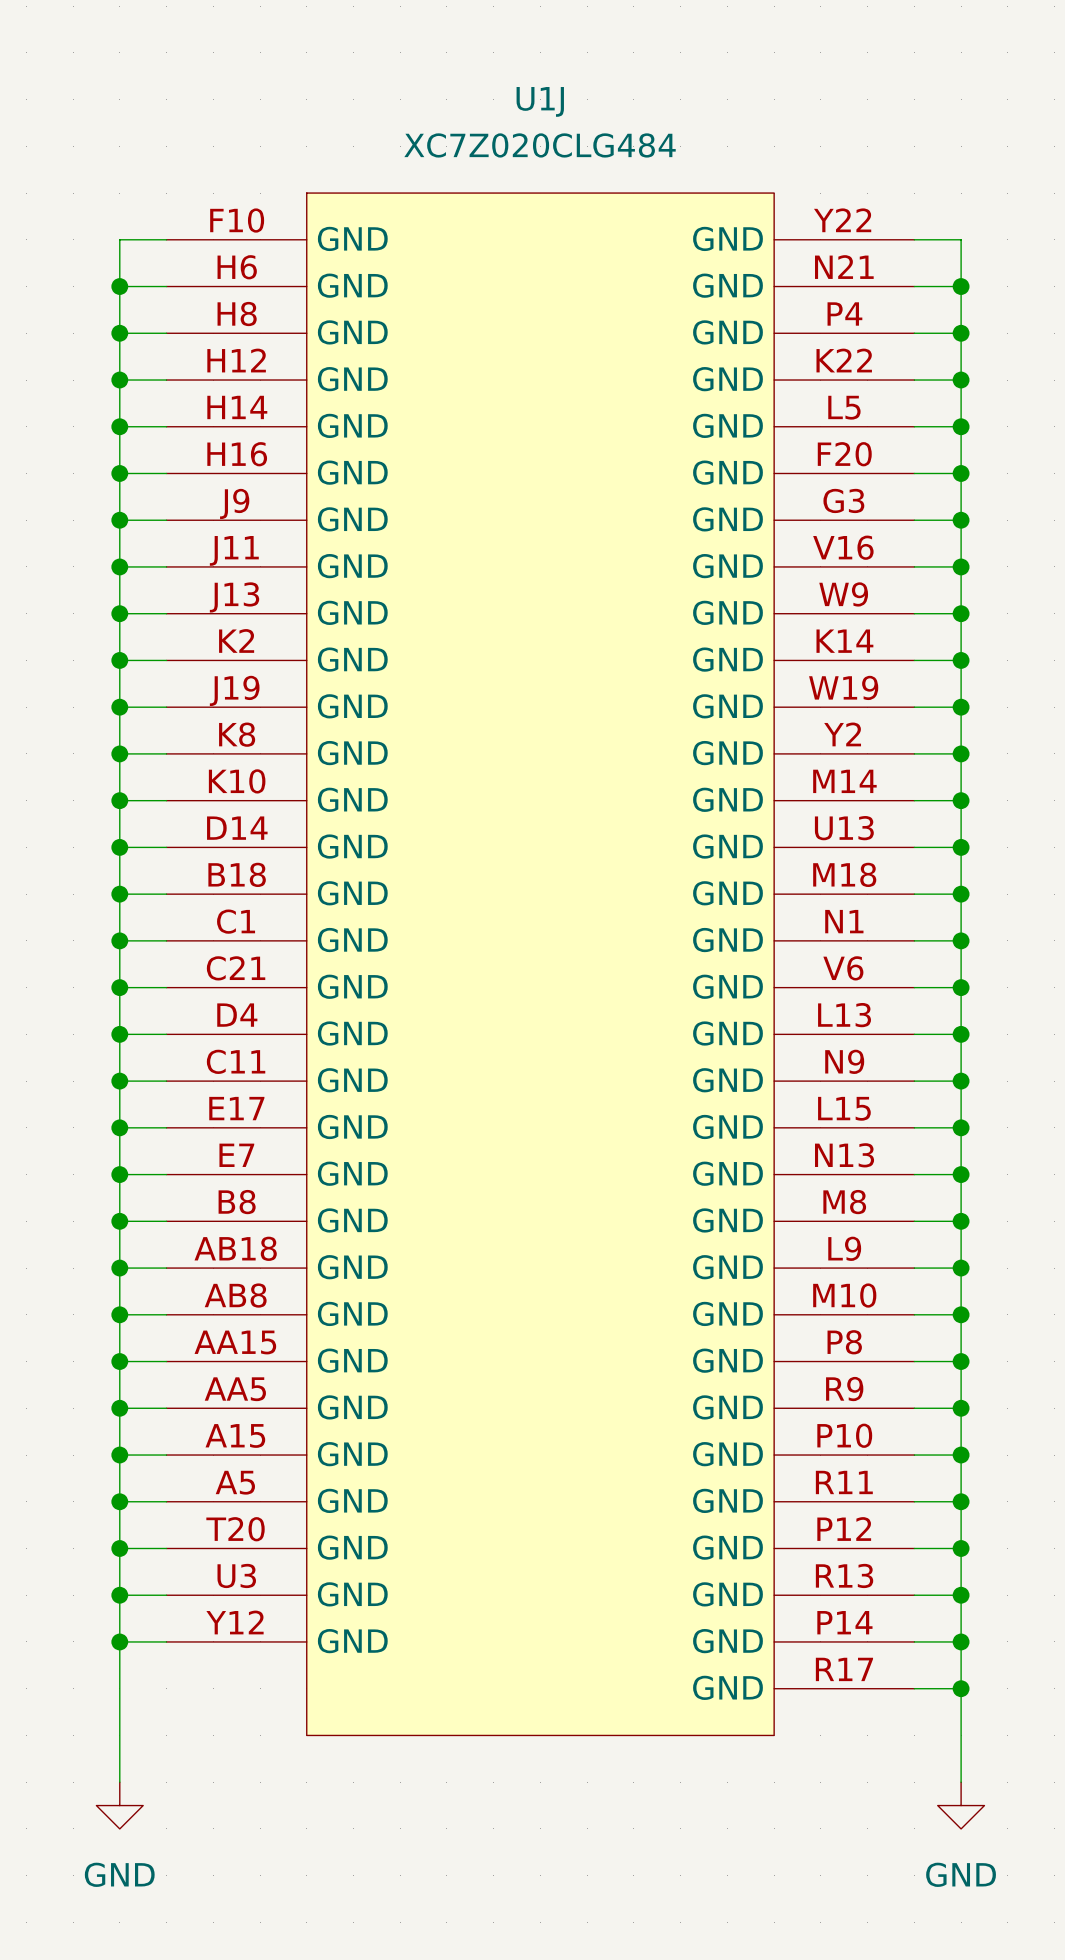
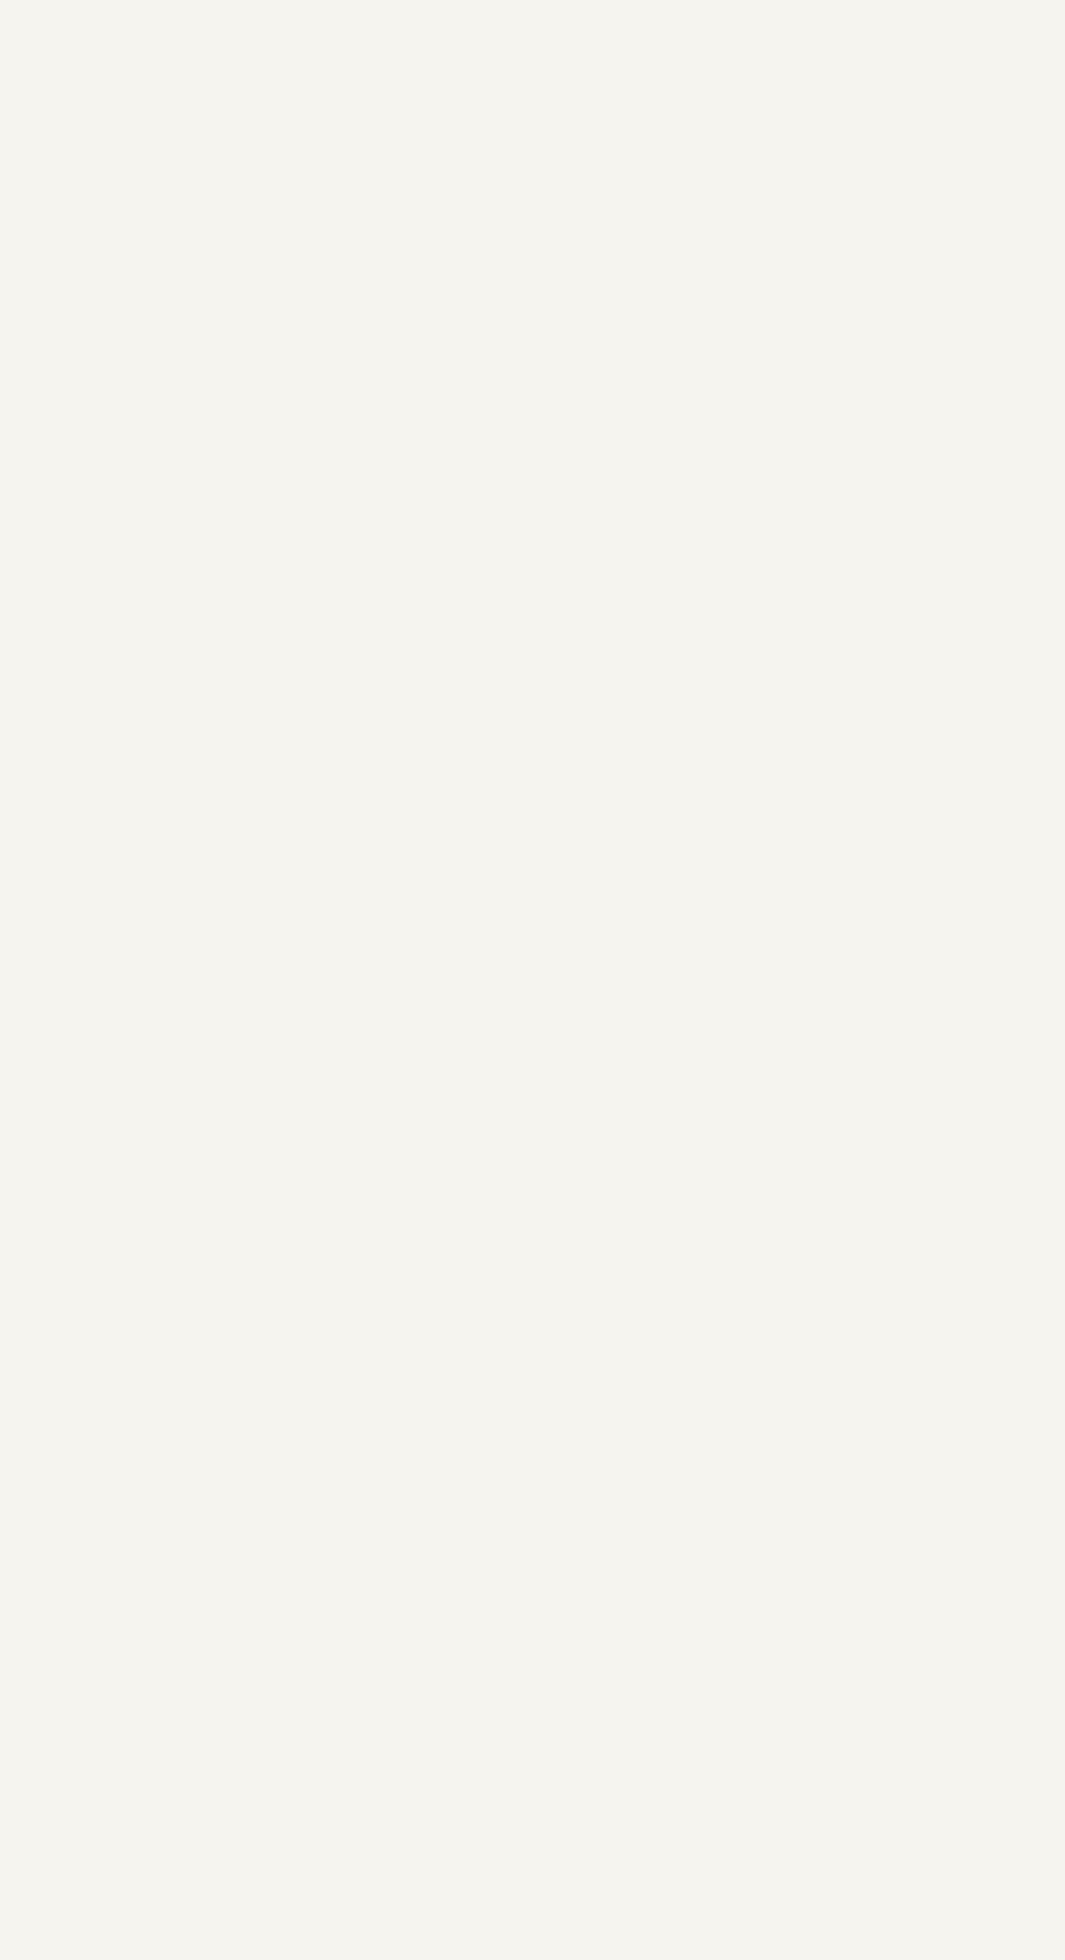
wire: (166, 239) (119, 239) (119, 1782) -> none
wire: (914, 239) (961, 239) (961, 1782) -> none
wire: (119, 286) (166, 286) -> none
junction: (119, 286) -> none
wire: (914, 286) (961, 286) -> none
junction: (961, 286) -> none
wire: (119, 333) (166, 333) -> none
junction: (119, 333) -> none
wire: (914, 333) (961, 333) -> none
junction: (961, 333) -> none
wire: (119, 380) (166, 380) -> none
junction: (119, 380) -> none
wire: (914, 380) (961, 380) -> none
junction: (961, 380) -> none
wire: (119, 426) (166, 426) -> none
junction: (119, 426) -> none
wire: (914, 426) (961, 426) -> none
junction: (961, 426) -> none
wire: (119, 473) (166, 473) -> none
junction: (119, 473) -> none
wire: (914, 473) (961, 473) -> none
junction: (961, 473) -> none
wire: (119, 520) (166, 520) -> none
junction: (119, 520) -> none
wire: (914, 520) (961, 520) -> none
junction: (961, 520) -> none
wire: (119, 566) (166, 566) -> none
junction: (119, 566) -> none
wire: (914, 566) (961, 566) -> none
junction: (961, 566) -> none
wire: (119, 613) (166, 613) -> none
junction: (119, 613) -> none
wire: (914, 613) (961, 613) -> none
junction: (961, 613) -> none
wire: (119, 660) (166, 660) -> none
junction: (119, 660) -> none
wire: (914, 660) (961, 660) -> none
junction: (961, 660) -> none
wire: (119, 707) (166, 707) -> none
junction: (119, 707) -> none
wire: (914, 707) (961, 707) -> none
junction: (961, 707) -> none
wire: (119, 753) (166, 753) -> none
junction: (119, 753) -> none
wire: (914, 753) (961, 753) -> none
junction: (961, 753) -> none
wire: (119, 800) (166, 800) -> none
junction: (119, 800) -> none
wire: (914, 800) (961, 800) -> none
junction: (961, 800) -> none
wire: (119, 847) (166, 847) -> none
junction: (119, 847) -> none
wire: (914, 847) (961, 847) -> none
junction: (961, 847) -> none
wire: (119, 894) (166, 894) -> none
junction: (119, 894) -> none
wire: (914, 894) (961, 894) -> none
junction: (961, 894) -> none
wire: (119, 940) (166, 940) -> none
junction: (119, 940) -> none
wire: (914, 940) (961, 940) -> none
junction: (961, 940) -> none
U1J: XC7Z020CLG484 (540, 964) -> none
wire: (119, 987) (166, 987) -> none
junction: (119, 987) -> none
wire: (914, 987) (961, 987) -> none
junction: (961, 987) -> none
wire: (119, 1034) (166, 1034) -> none
junction: (119, 1034) -> none
wire: (914, 1034) (961, 1034) -> none
junction: (961, 1034) -> none
wire: (119, 1081) (166, 1081) -> none
junction: (119, 1081) -> none
wire: (914, 1081) (961, 1081) -> none
junction: (961, 1081) -> none
wire: (119, 1127) (166, 1127) -> none
junction: (119, 1127) -> none
wire: (914, 1127) (961, 1127) -> none
junction: (961, 1127) -> none
wire: (119, 1174) (166, 1174) -> none
junction: (119, 1174) -> none
wire: (914, 1174) (961, 1174) -> none
junction: (961, 1174) -> none
wire: (119, 1221) (166, 1221) -> none
junction: (119, 1221) -> none
wire: (914, 1221) (961, 1221) -> none
junction: (961, 1221) -> none
wire: (119, 1268) (166, 1268) -> none
junction: (119, 1268) -> none
wire: (914, 1268) (961, 1268) -> none
junction: (961, 1268) -> none
wire: (119, 1314) (166, 1314) -> none
junction: (119, 1314) -> none
wire: (914, 1314) (961, 1314) -> none
junction: (961, 1314) -> none
wire: (119, 1361) (166, 1361) -> none
junction: (119, 1361) -> none
wire: (914, 1361) (961, 1361) -> none
junction: (961, 1361) -> none
wire: (119, 1408) (166, 1408) -> none
junction: (119, 1408) -> none
wire: (914, 1408) (961, 1408) -> none
junction: (961, 1408) -> none
wire: (119, 1455) (166, 1455) -> none
junction: (119, 1455) -> none
wire: (914, 1455) (961, 1455) -> none
junction: (961, 1455) -> none
wire: (119, 1501) (166, 1501) -> none
junction: (119, 1501) -> none
wire: (914, 1501) (961, 1501) -> none
junction: (961, 1501) -> none
wire: (119, 1548) (166, 1548) -> none
junction: (119, 1548) -> none
wire: (914, 1548) (961, 1548) -> none
junction: (961, 1548) -> none
wire: (119, 1595) (166, 1595) -> none
junction: (119, 1595) -> none
wire: (914, 1595) (961, 1595) -> none
junction: (961, 1595) -> none
wire: (119, 1641) (166, 1641) -> none
junction: (119, 1641) -> none
wire: (914, 1641) (961, 1641) -> none
junction: (961, 1641) -> none
wire: (914, 1688) (961, 1688) -> none
junction: (961, 1688) -> none
power symbol: GND (119, 1805) -> none
power symbol: GND (961, 1805) -> none

